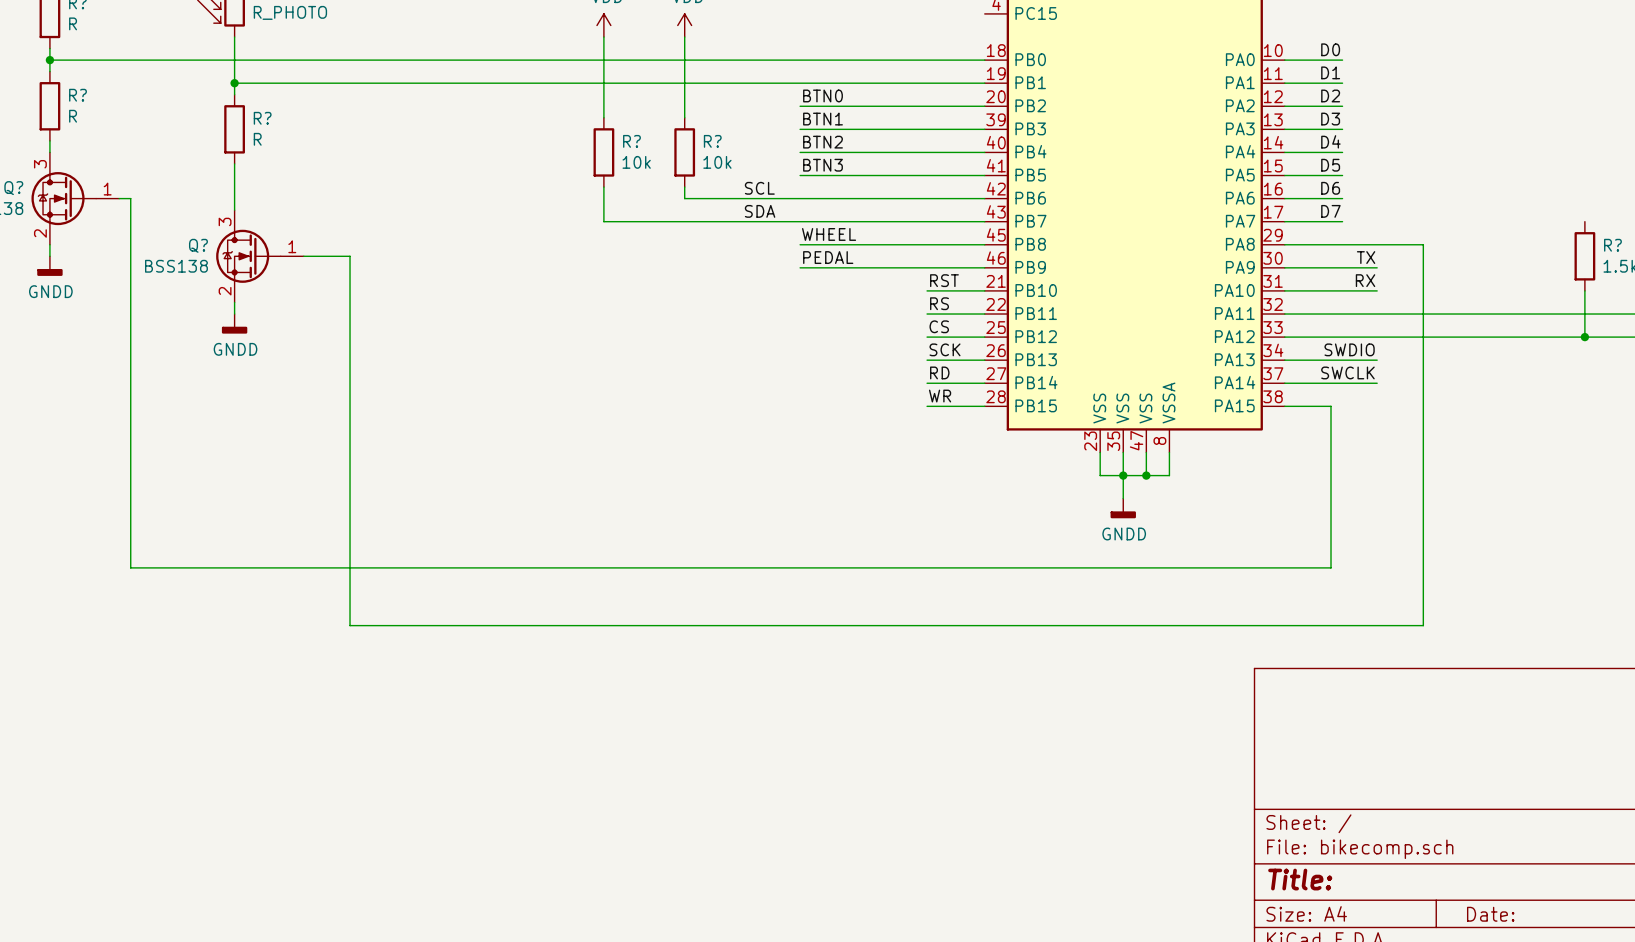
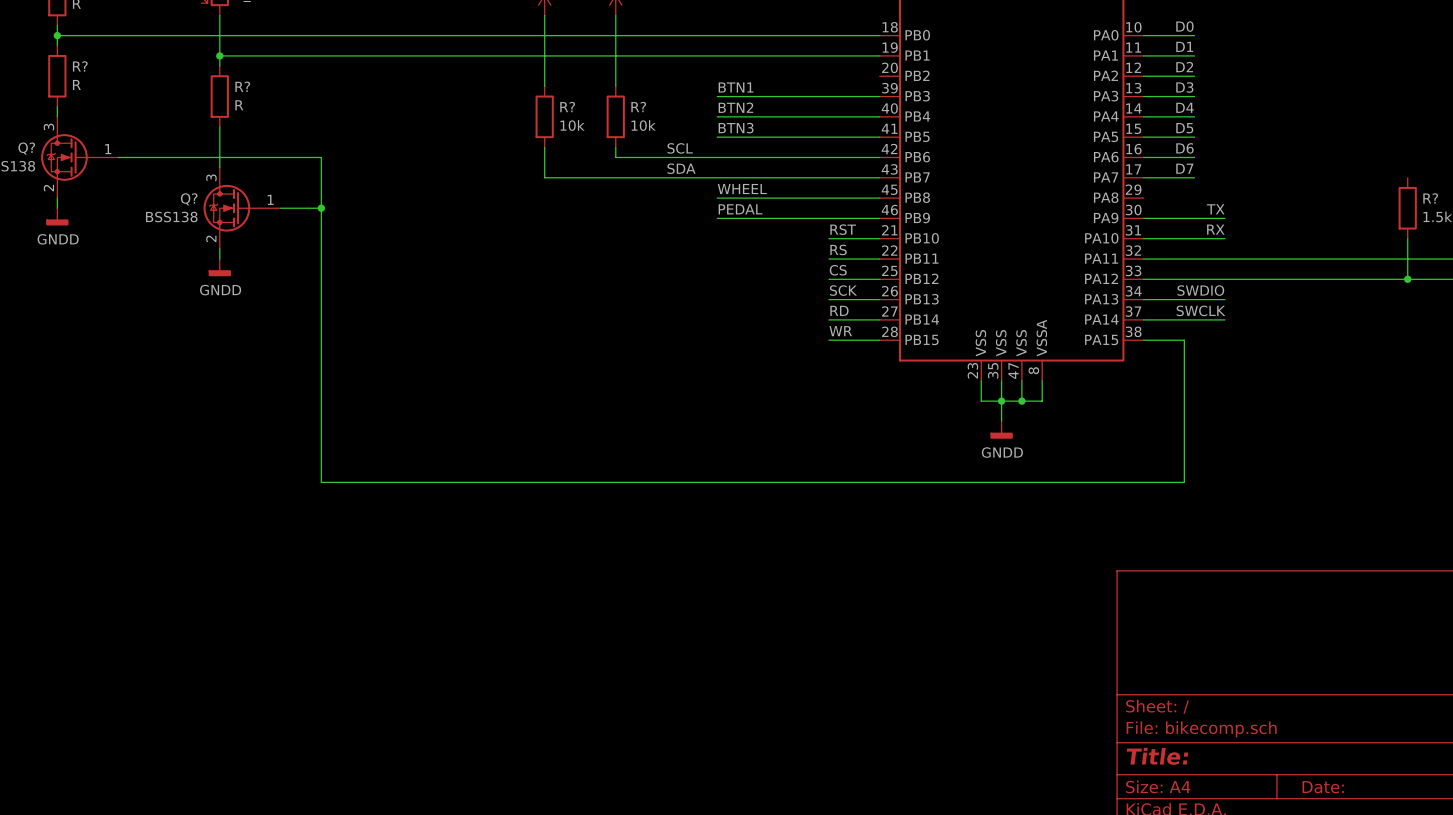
label: BTN0 (823, 95) -> none
wire: (800, 106) (984, 106) -> none
wire: (130, 198) (130, 567) (350, 567) (350, 625) (1423, 625) (1423, 244) (1284, 244) -> (128, 157) (321, 157) (321, 208)
junction: none -> (321, 208)

